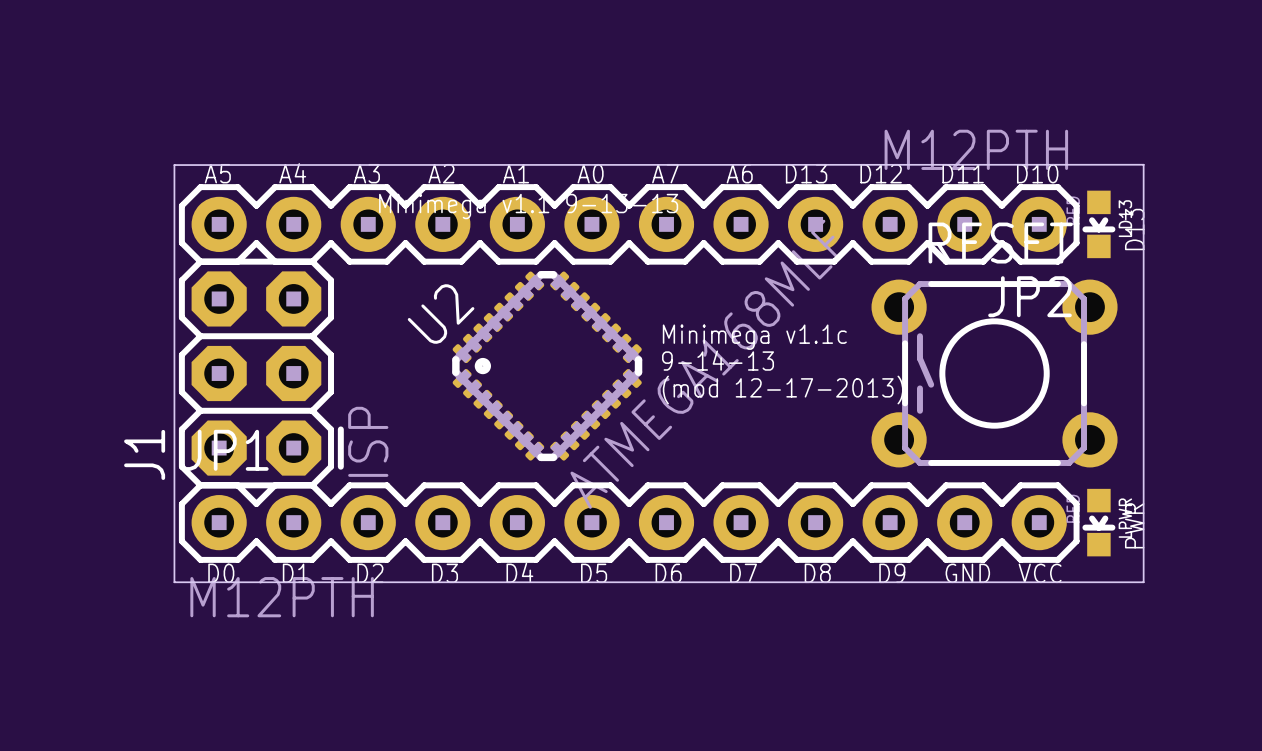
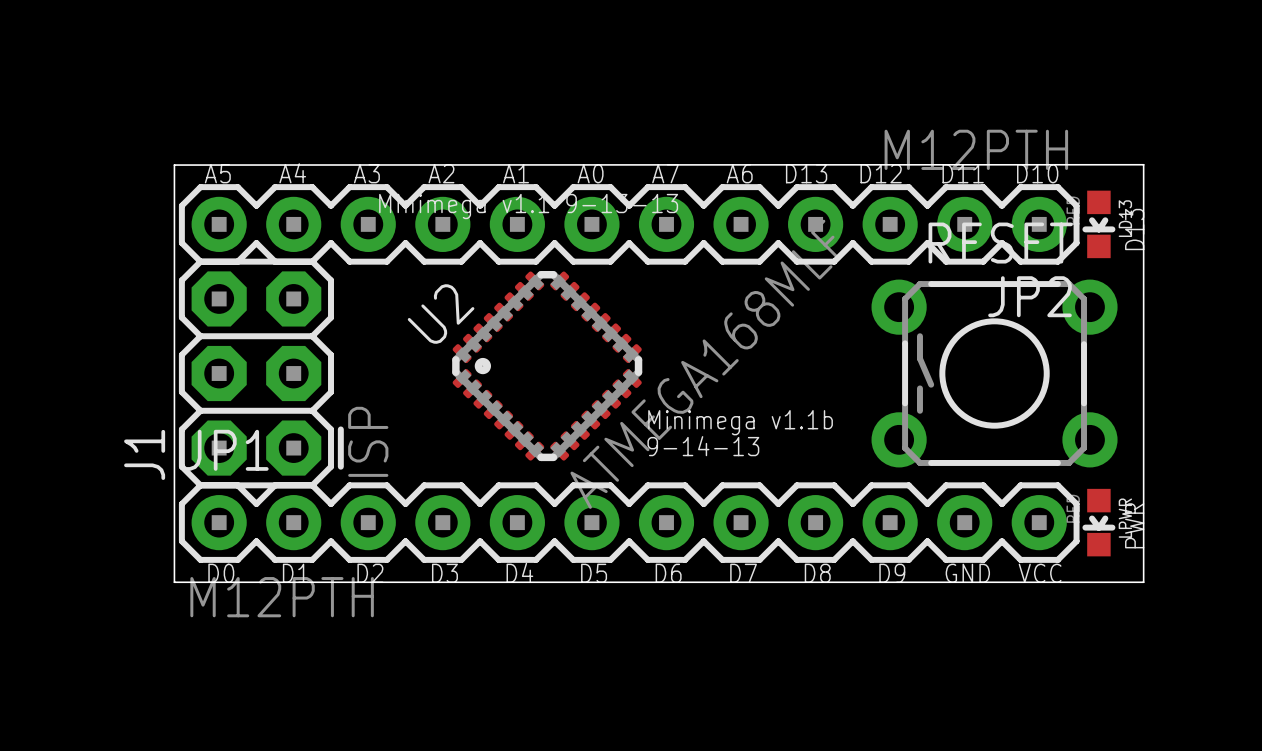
text: Minimega v1.1c (754, 337) -> none
text position: 9-14-13 (718, 360) -> 9-14-13 (703, 446)
text: (mod 12-17-2013) (783, 390) -> none
text: none -> Minimega v1.1b (740, 422)

